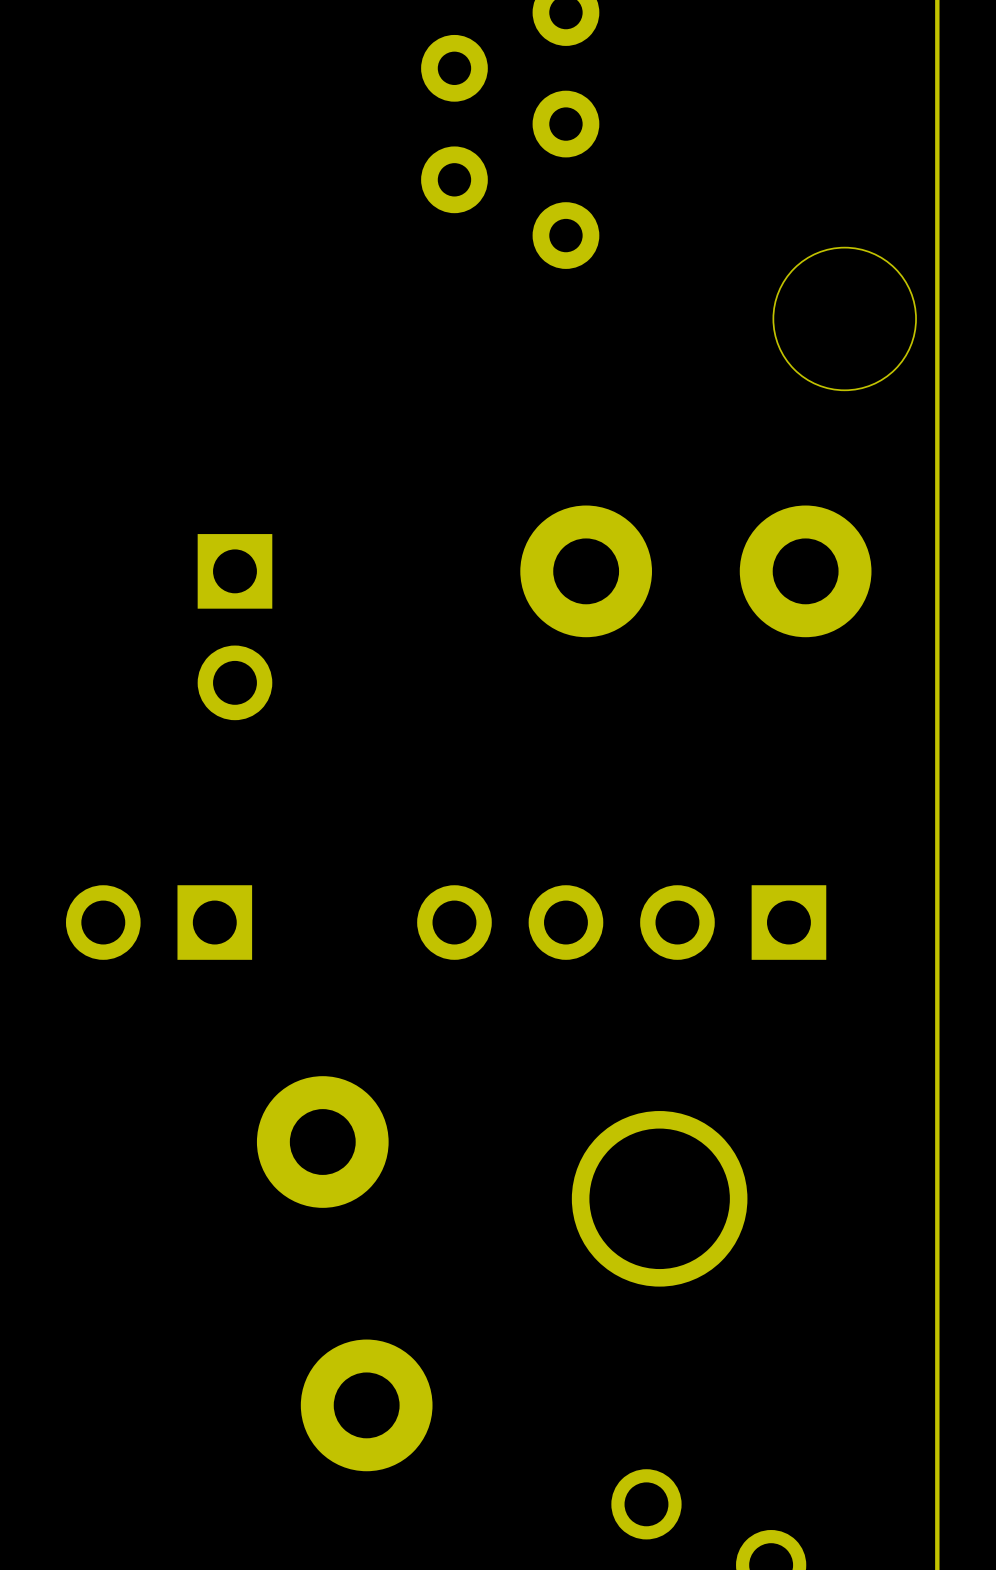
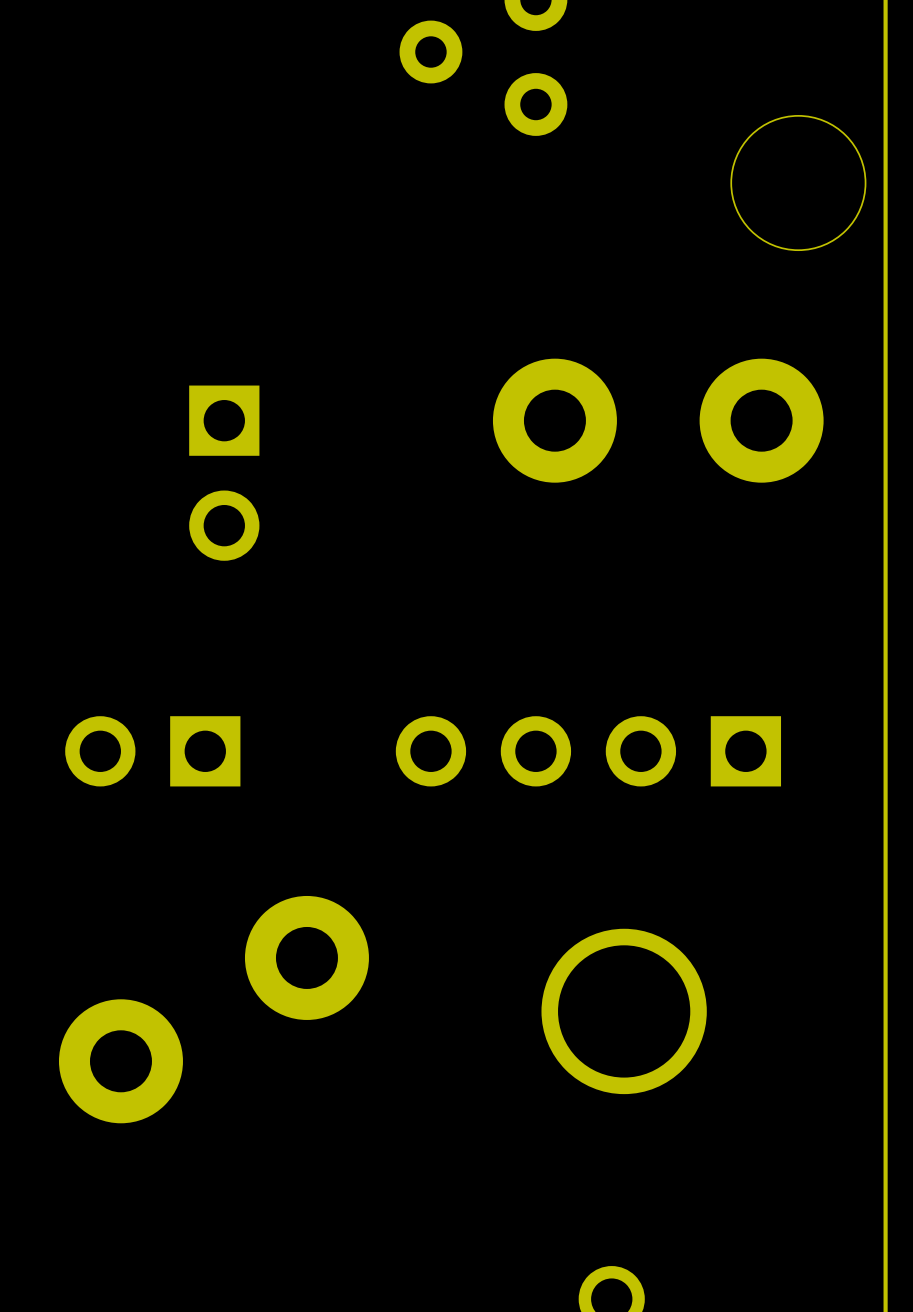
part position: (366, 1405) -> (120, 1061)

